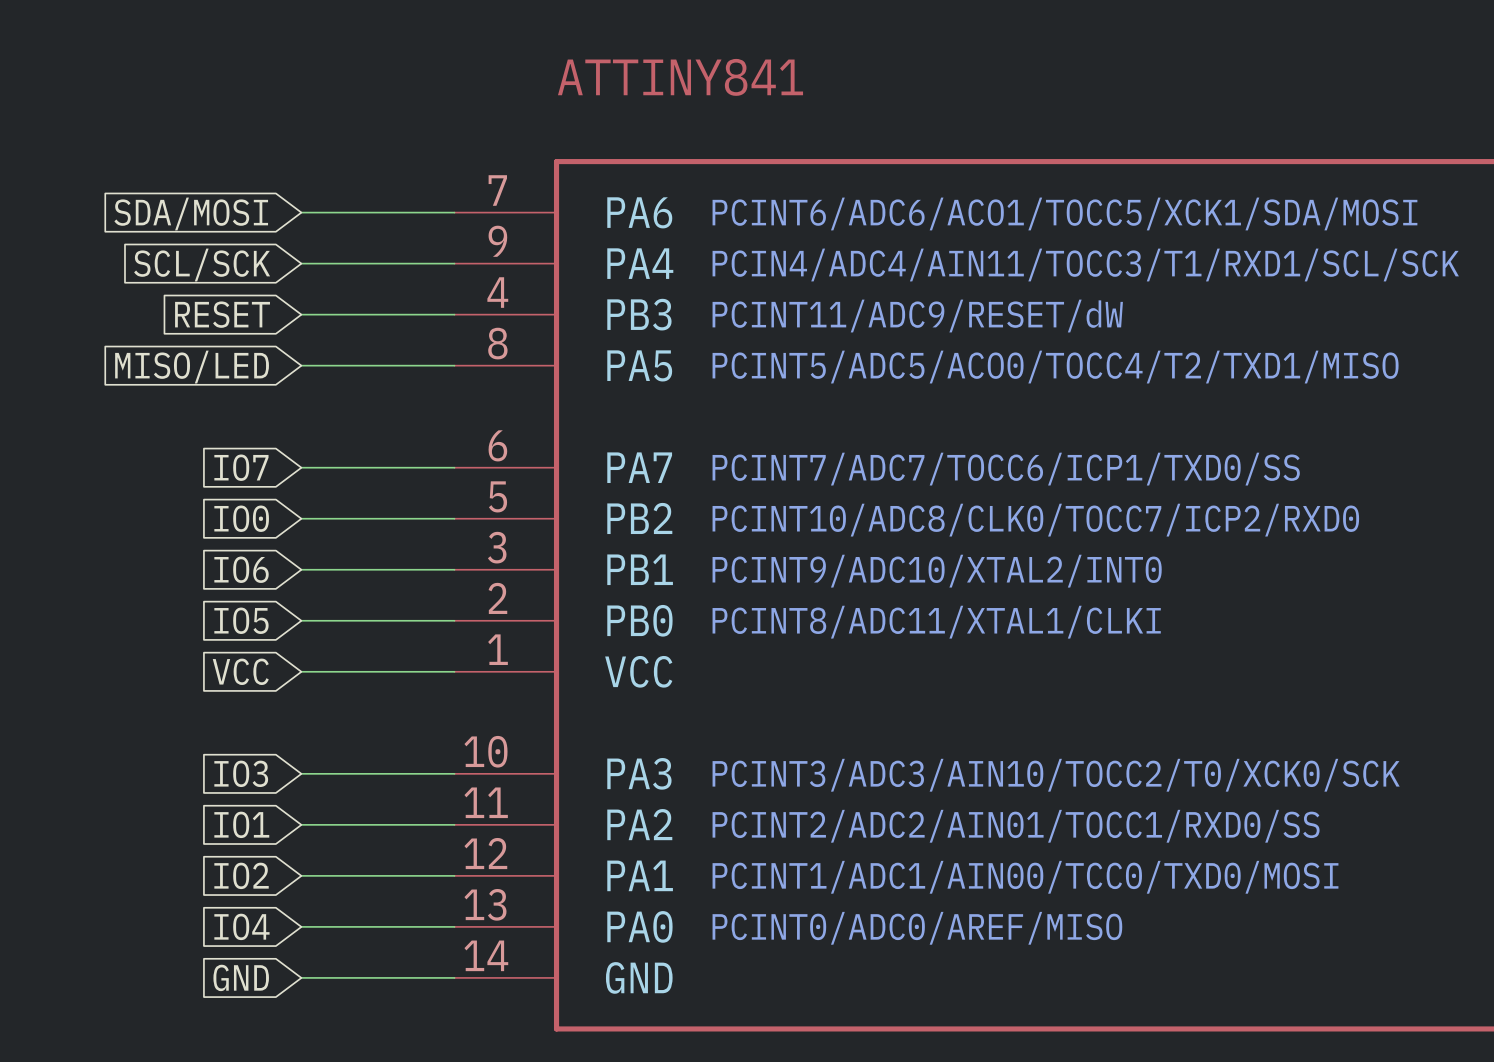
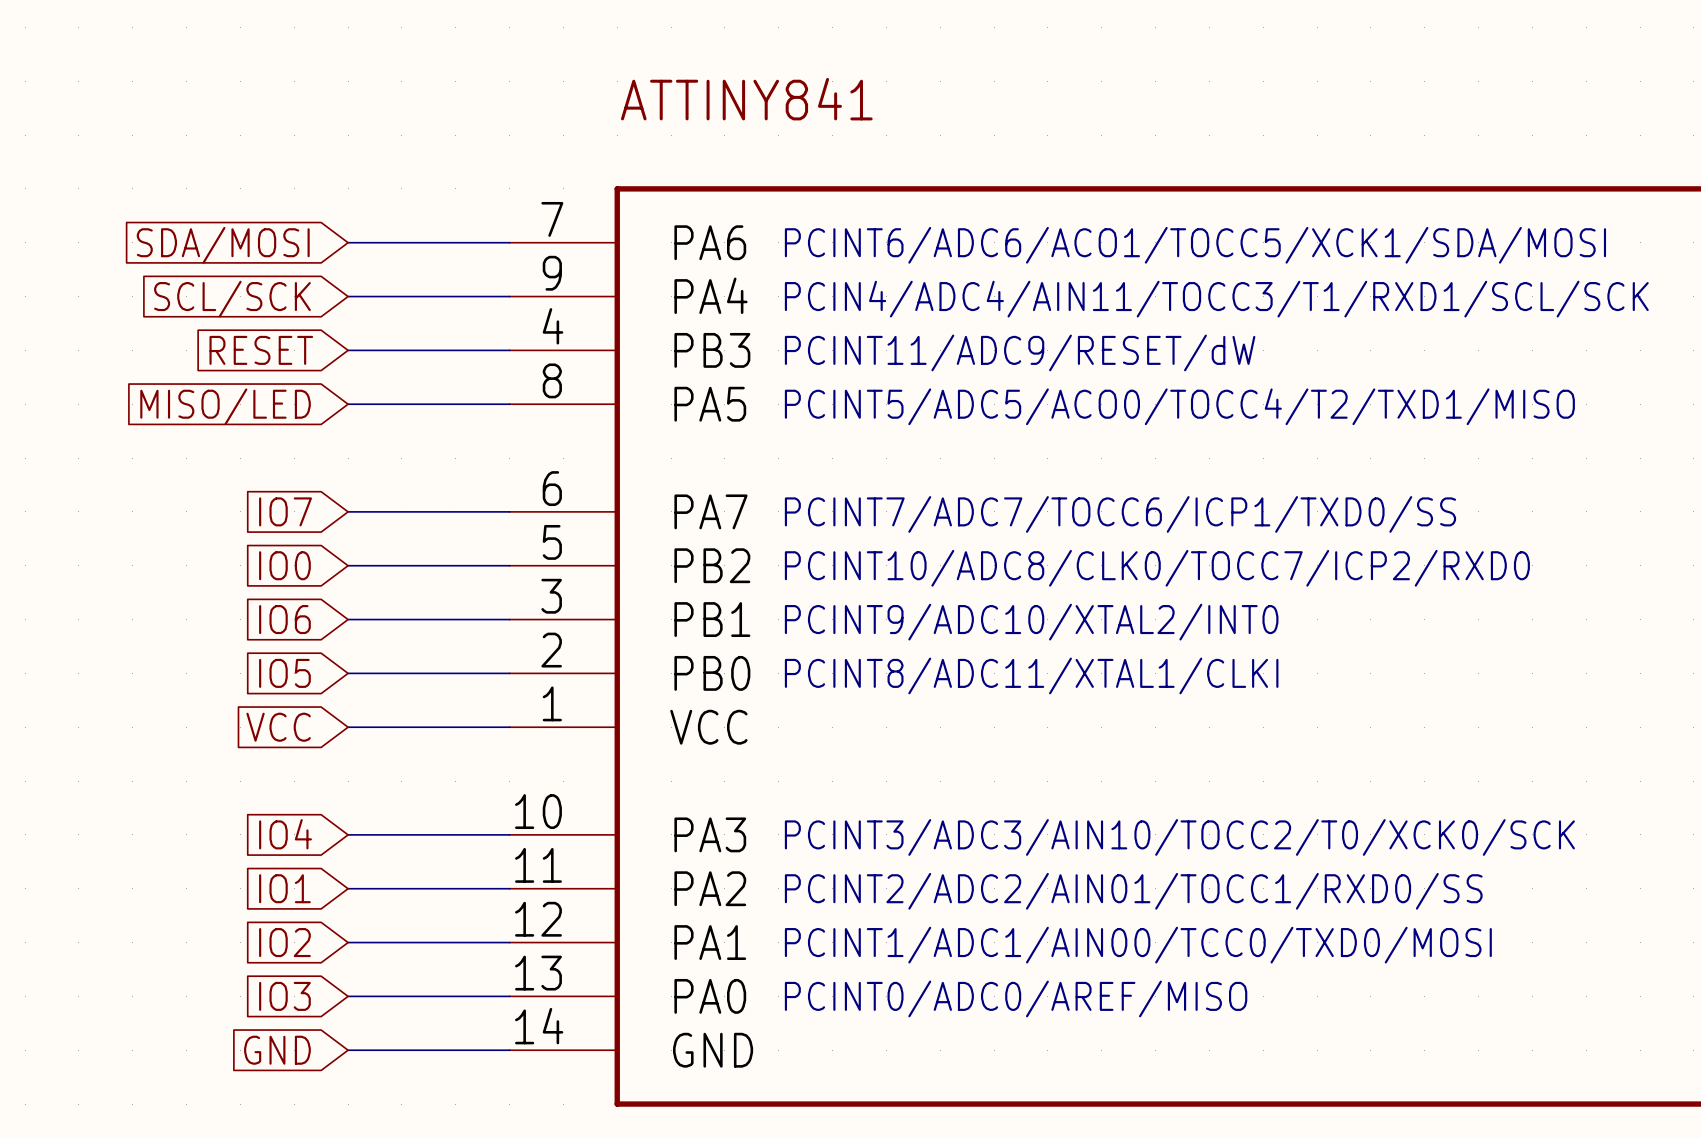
global label: IO3 (241, 773) -> IO4 (285, 834)
global label: IO4 (241, 926) -> IO3 (284, 996)

